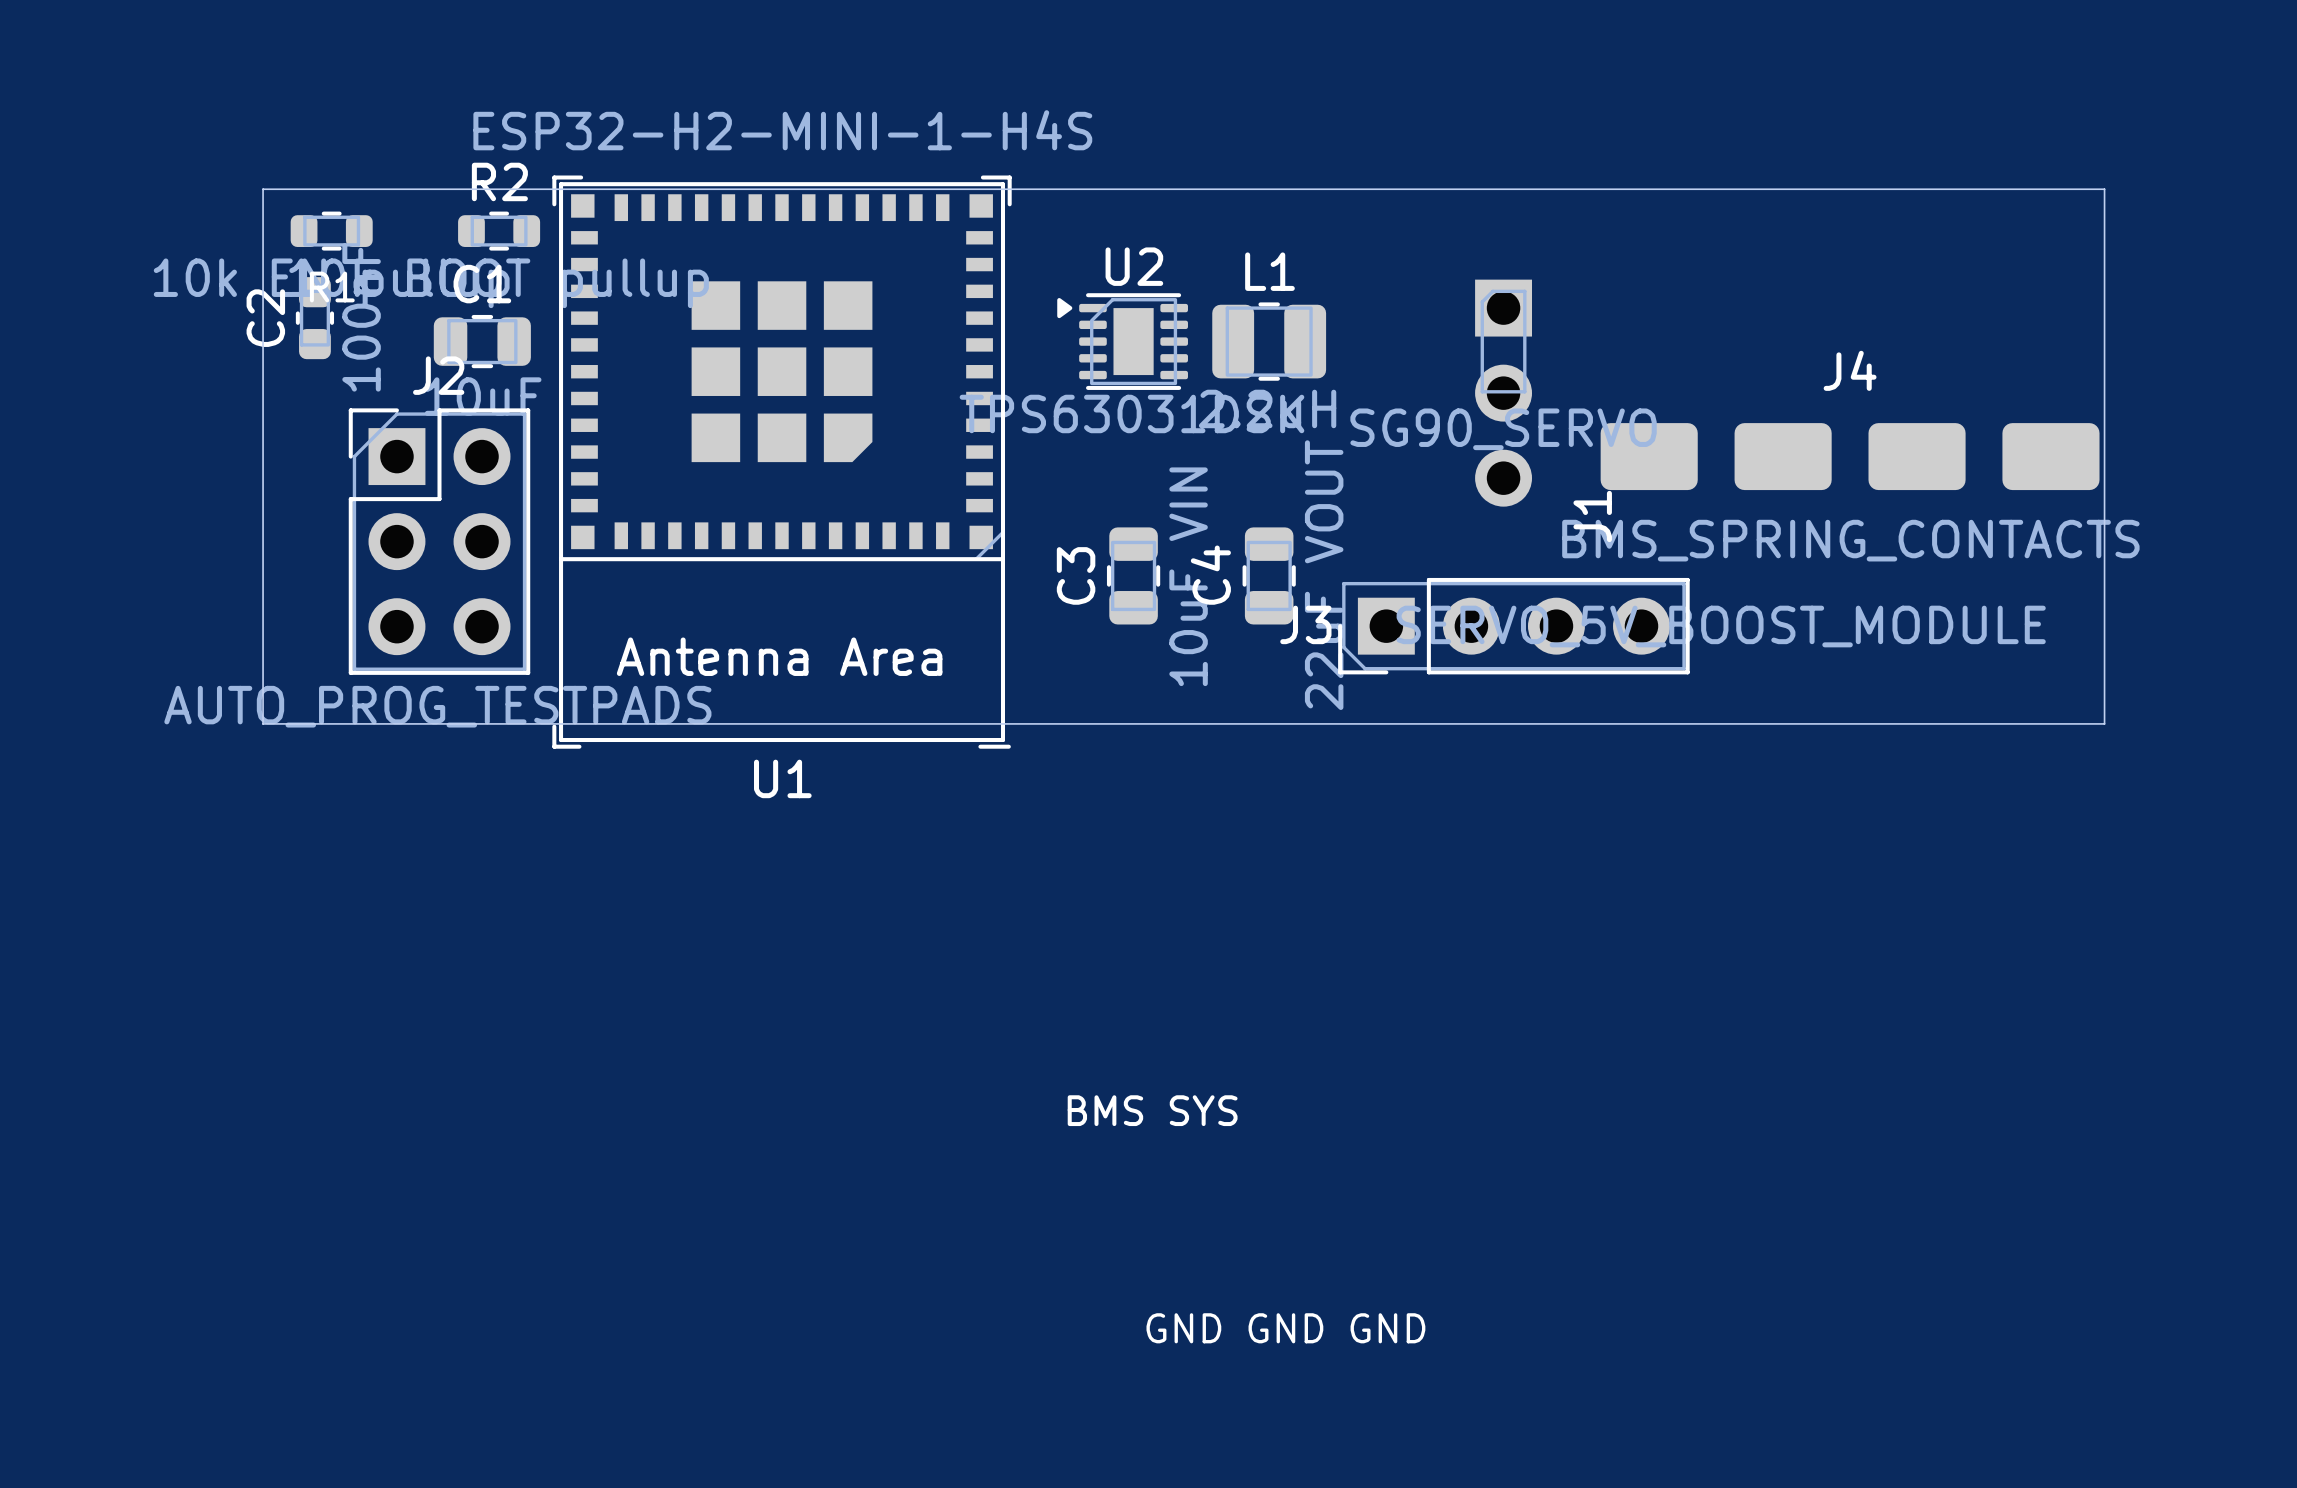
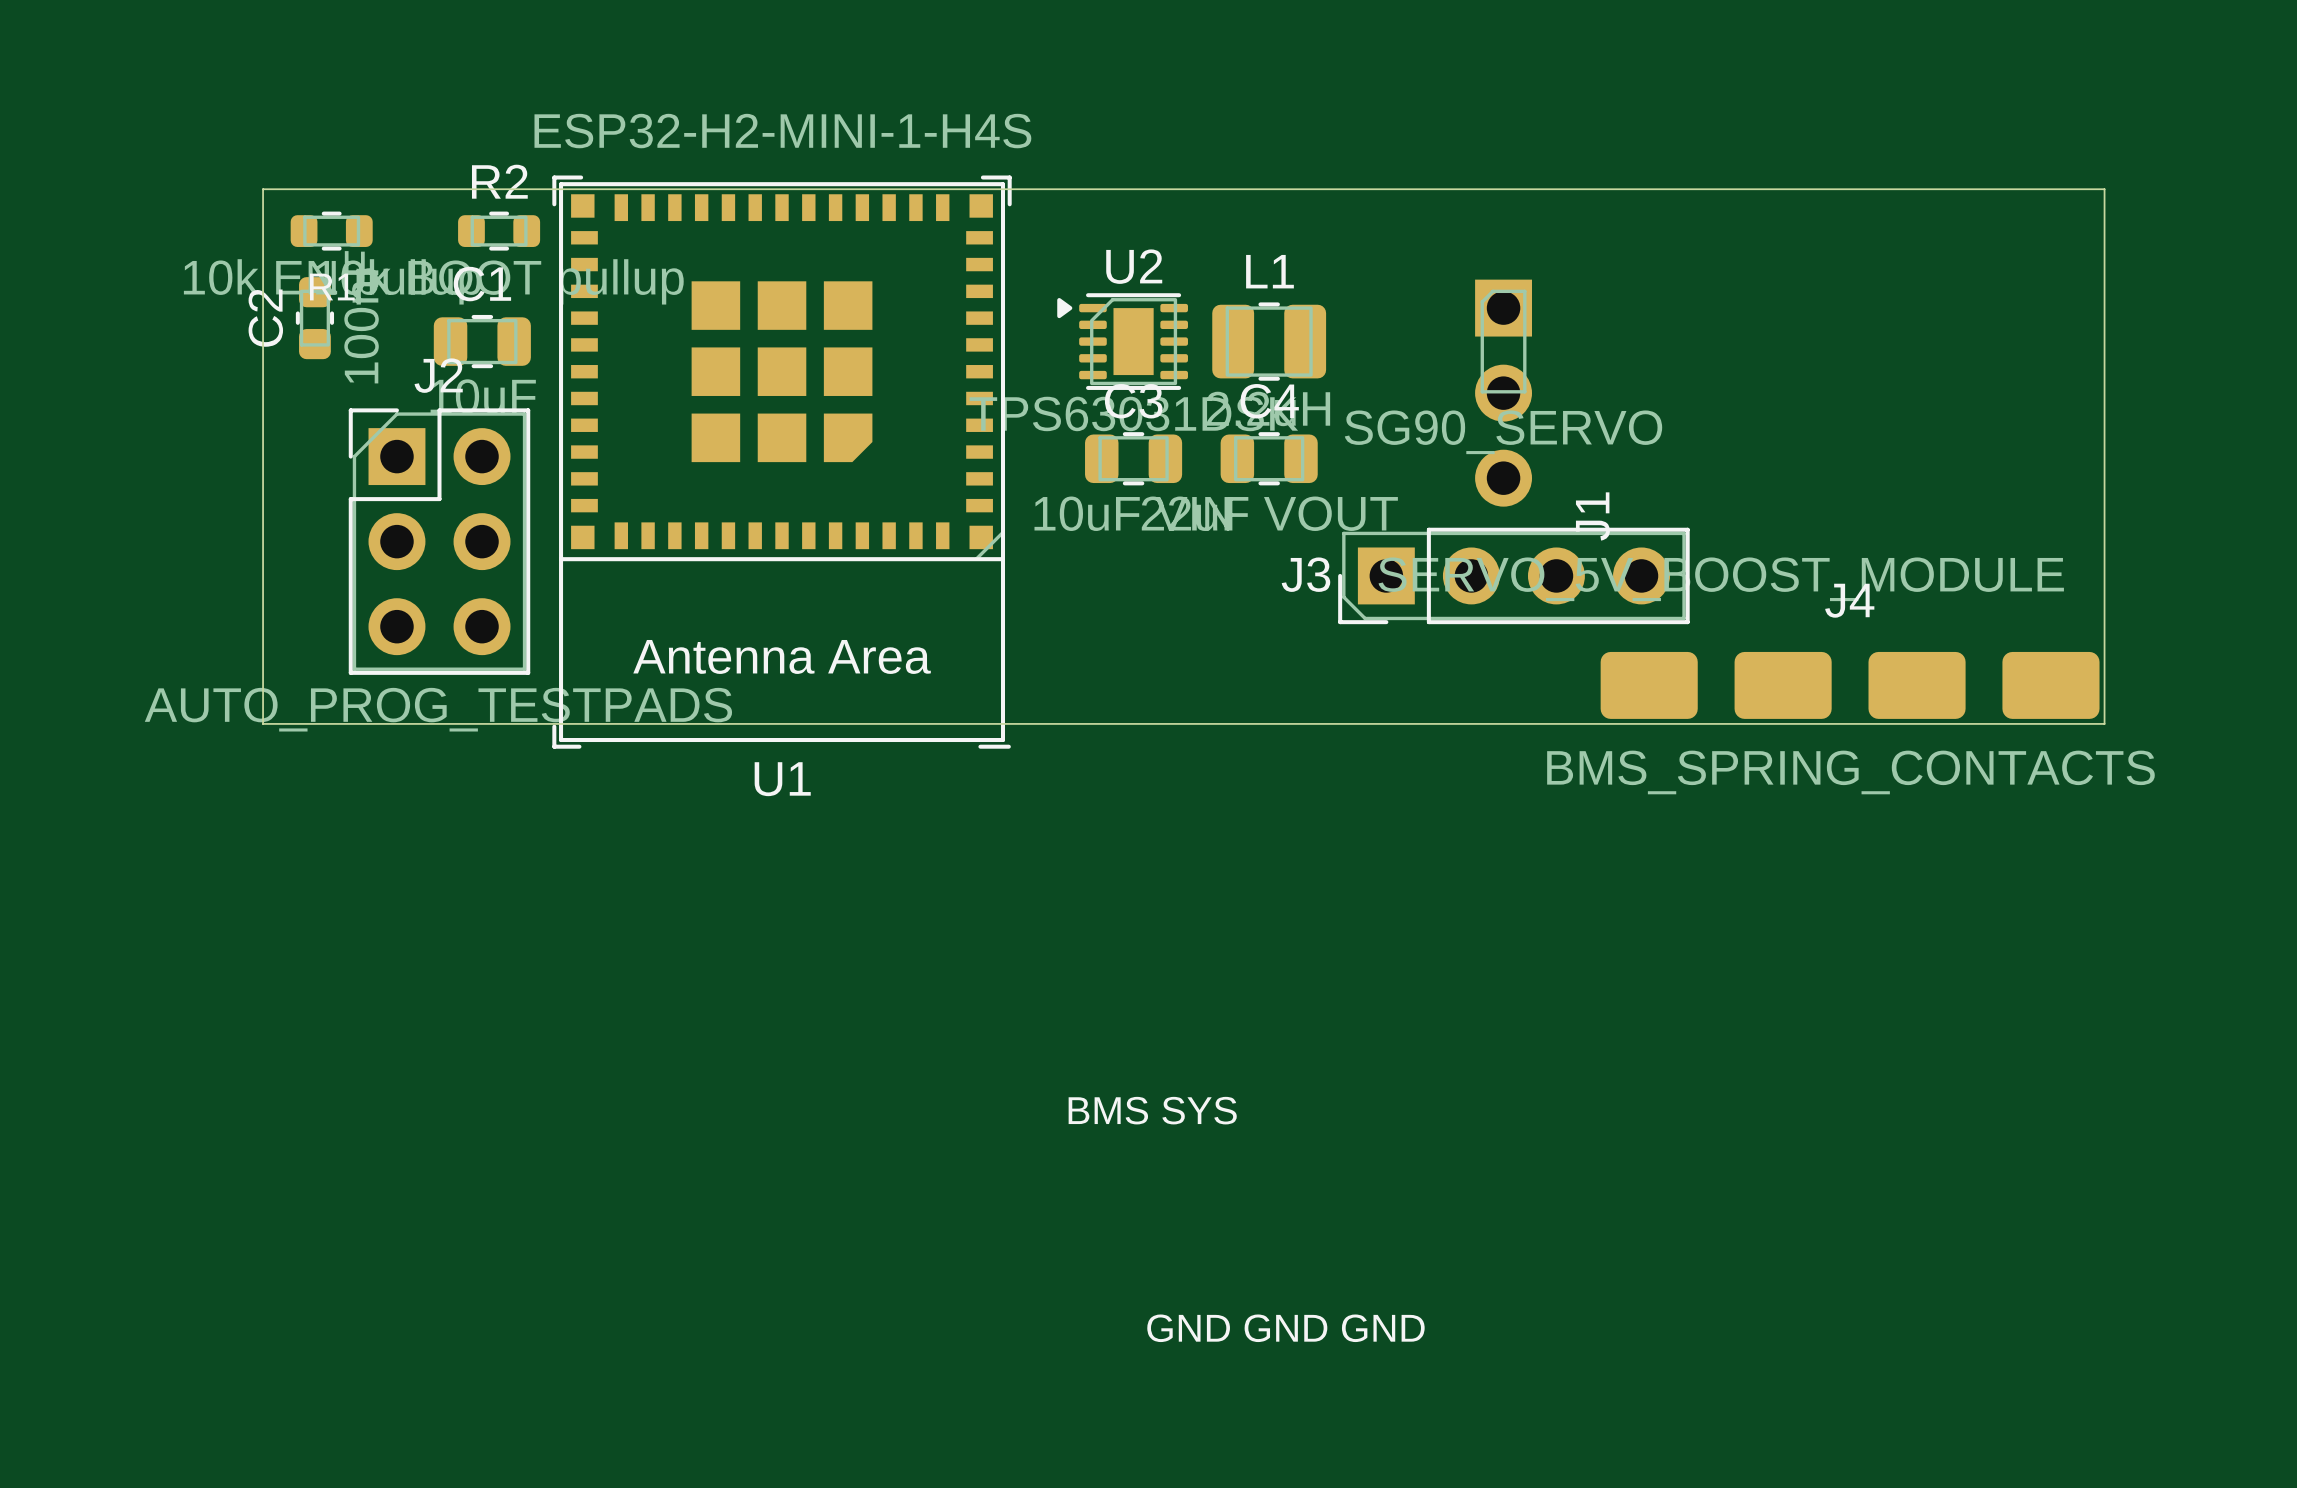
J4 position: (1850, 456) -> (1850, 685)
C3 rotation: 0° (1133, 575) -> 90° clockwise (1133, 458)
C3 position: (1133, 575) -> (1133, 458)
C4 rotation: 0° (1269, 575) -> 90° clockwise (1269, 458)
C4 position: (1269, 575) -> (1269, 458)
J3 position: (1513, 626) -> (1513, 575)

